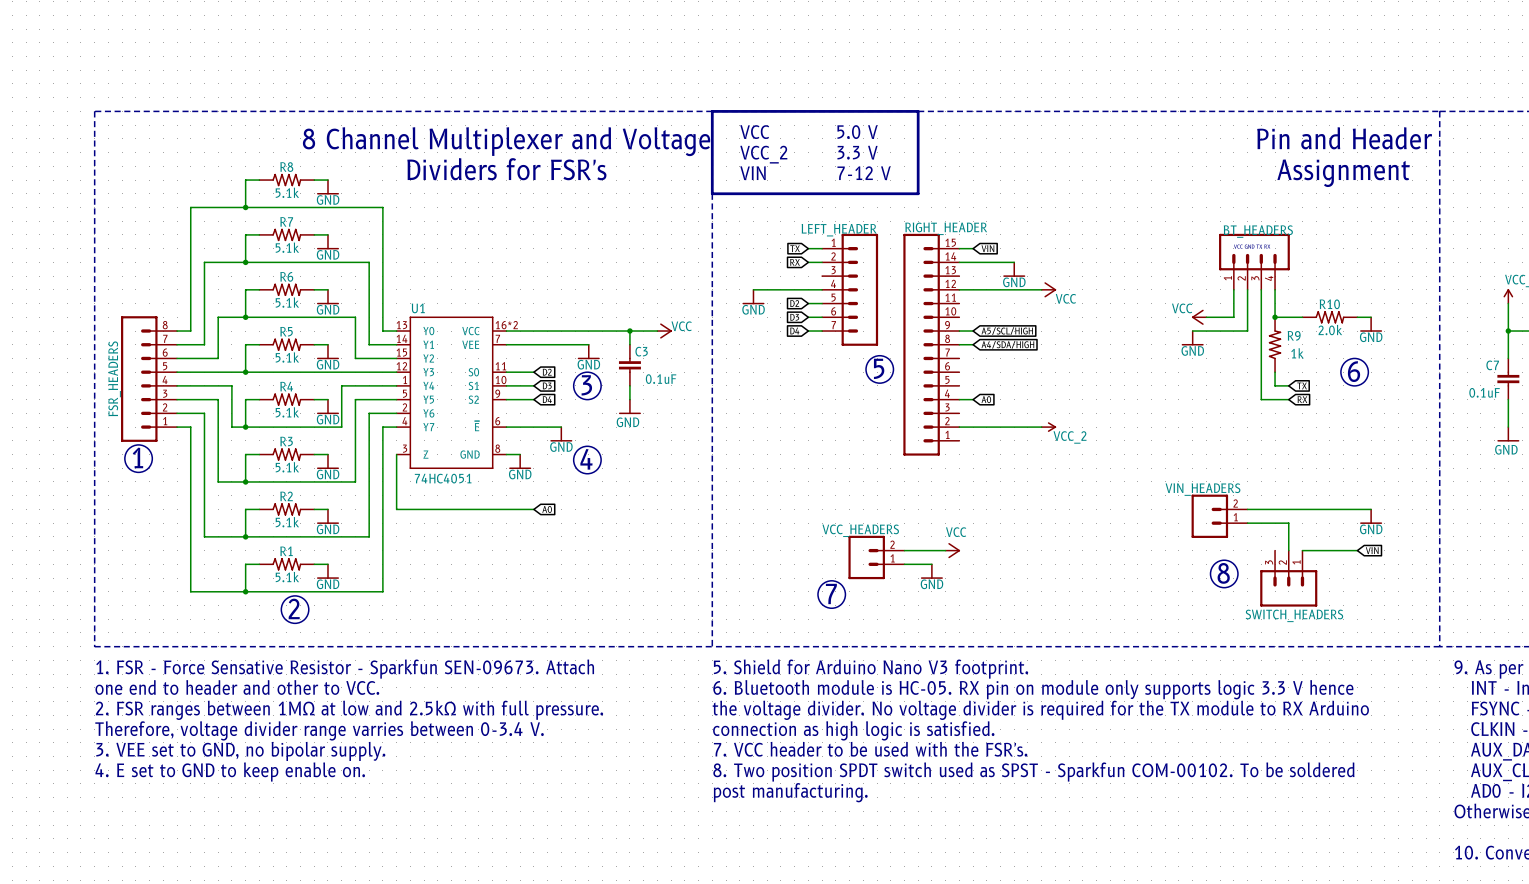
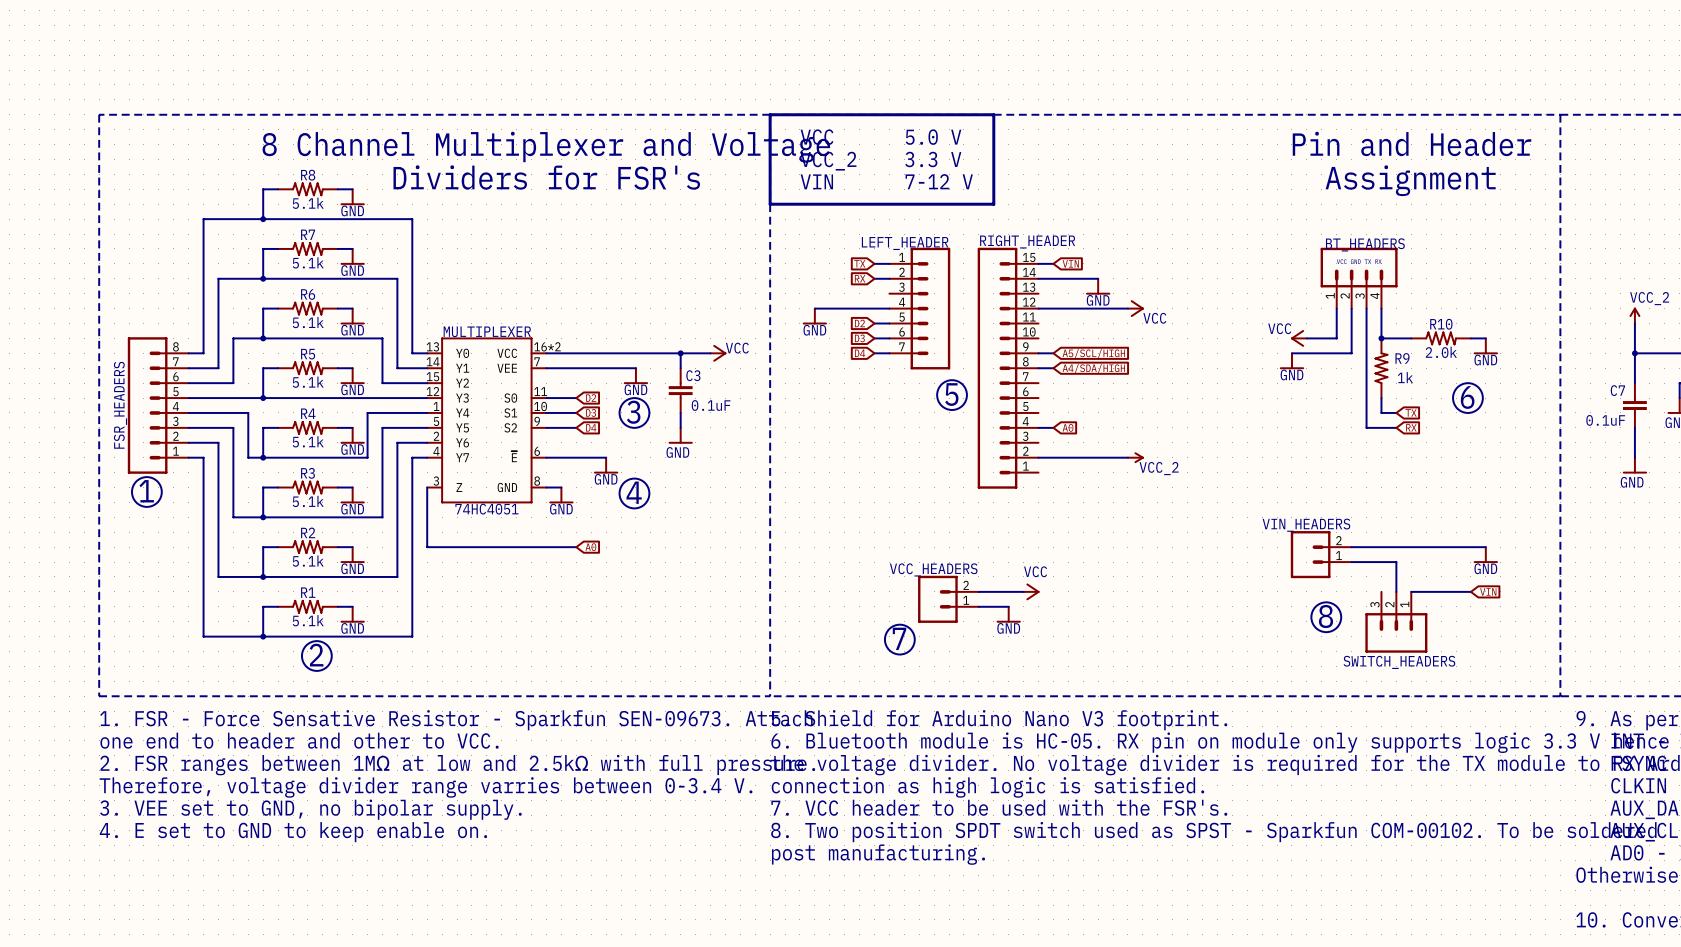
text position: Pin and Header (1344, 138) -> Pin and Header (1411, 143)
text position: Assignment (1343, 173) -> Assignment (1410, 180)
74HC4051 value: U1 (418, 308) -> 74HC4051 (486, 509)
74HC4051 name: 74HC4051 (443, 478) -> MULTIPLEXER (487, 331)

